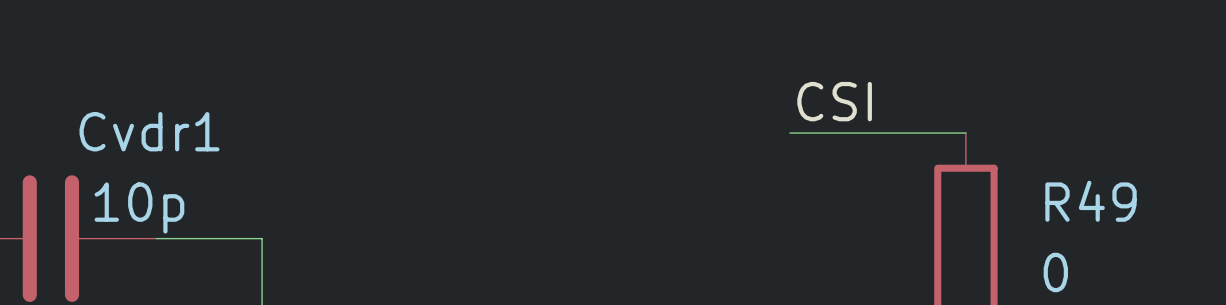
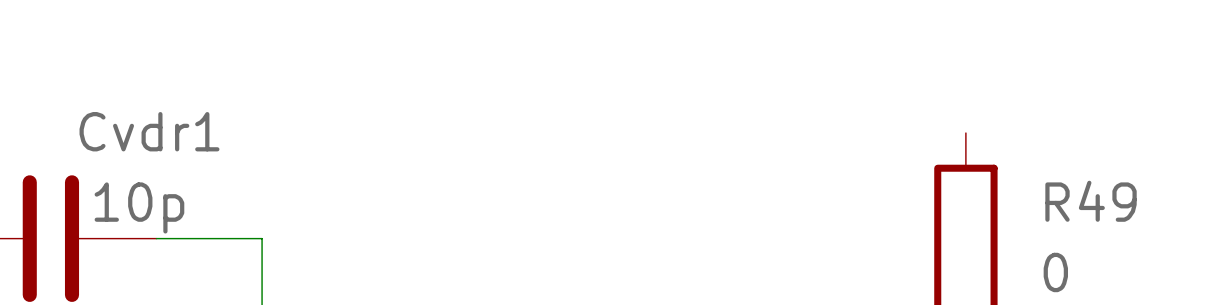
label: CSI (834, 101) -> none
wire: (789, 133) (965, 133) -> none

